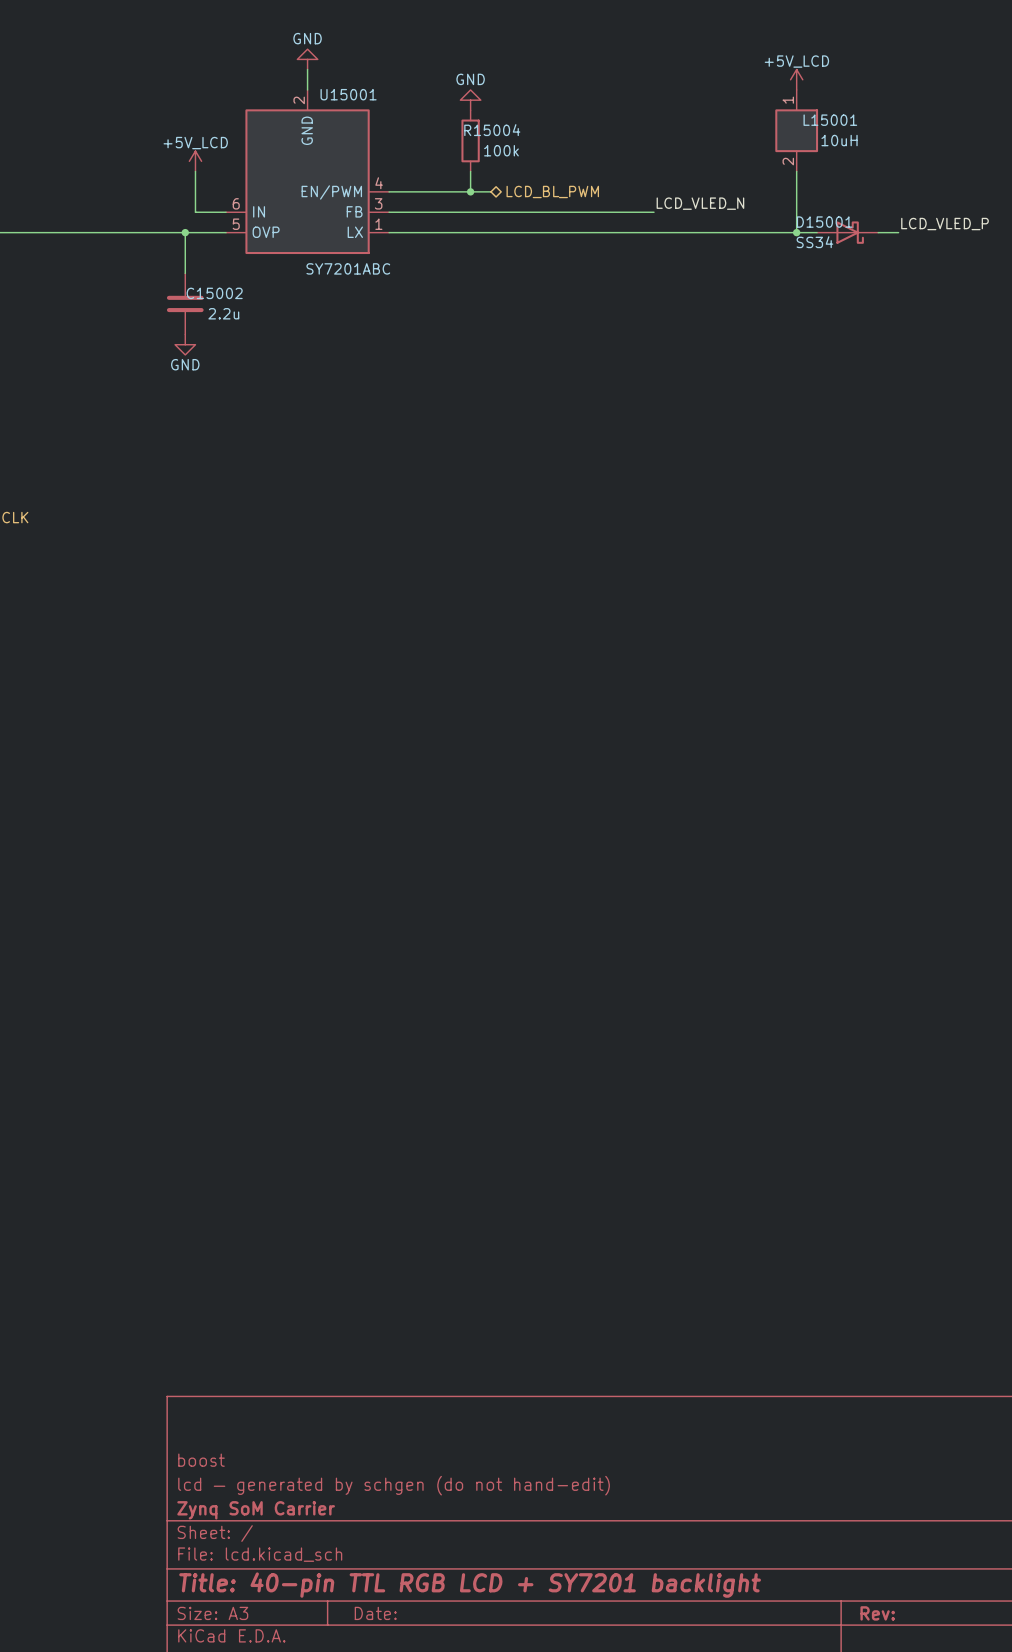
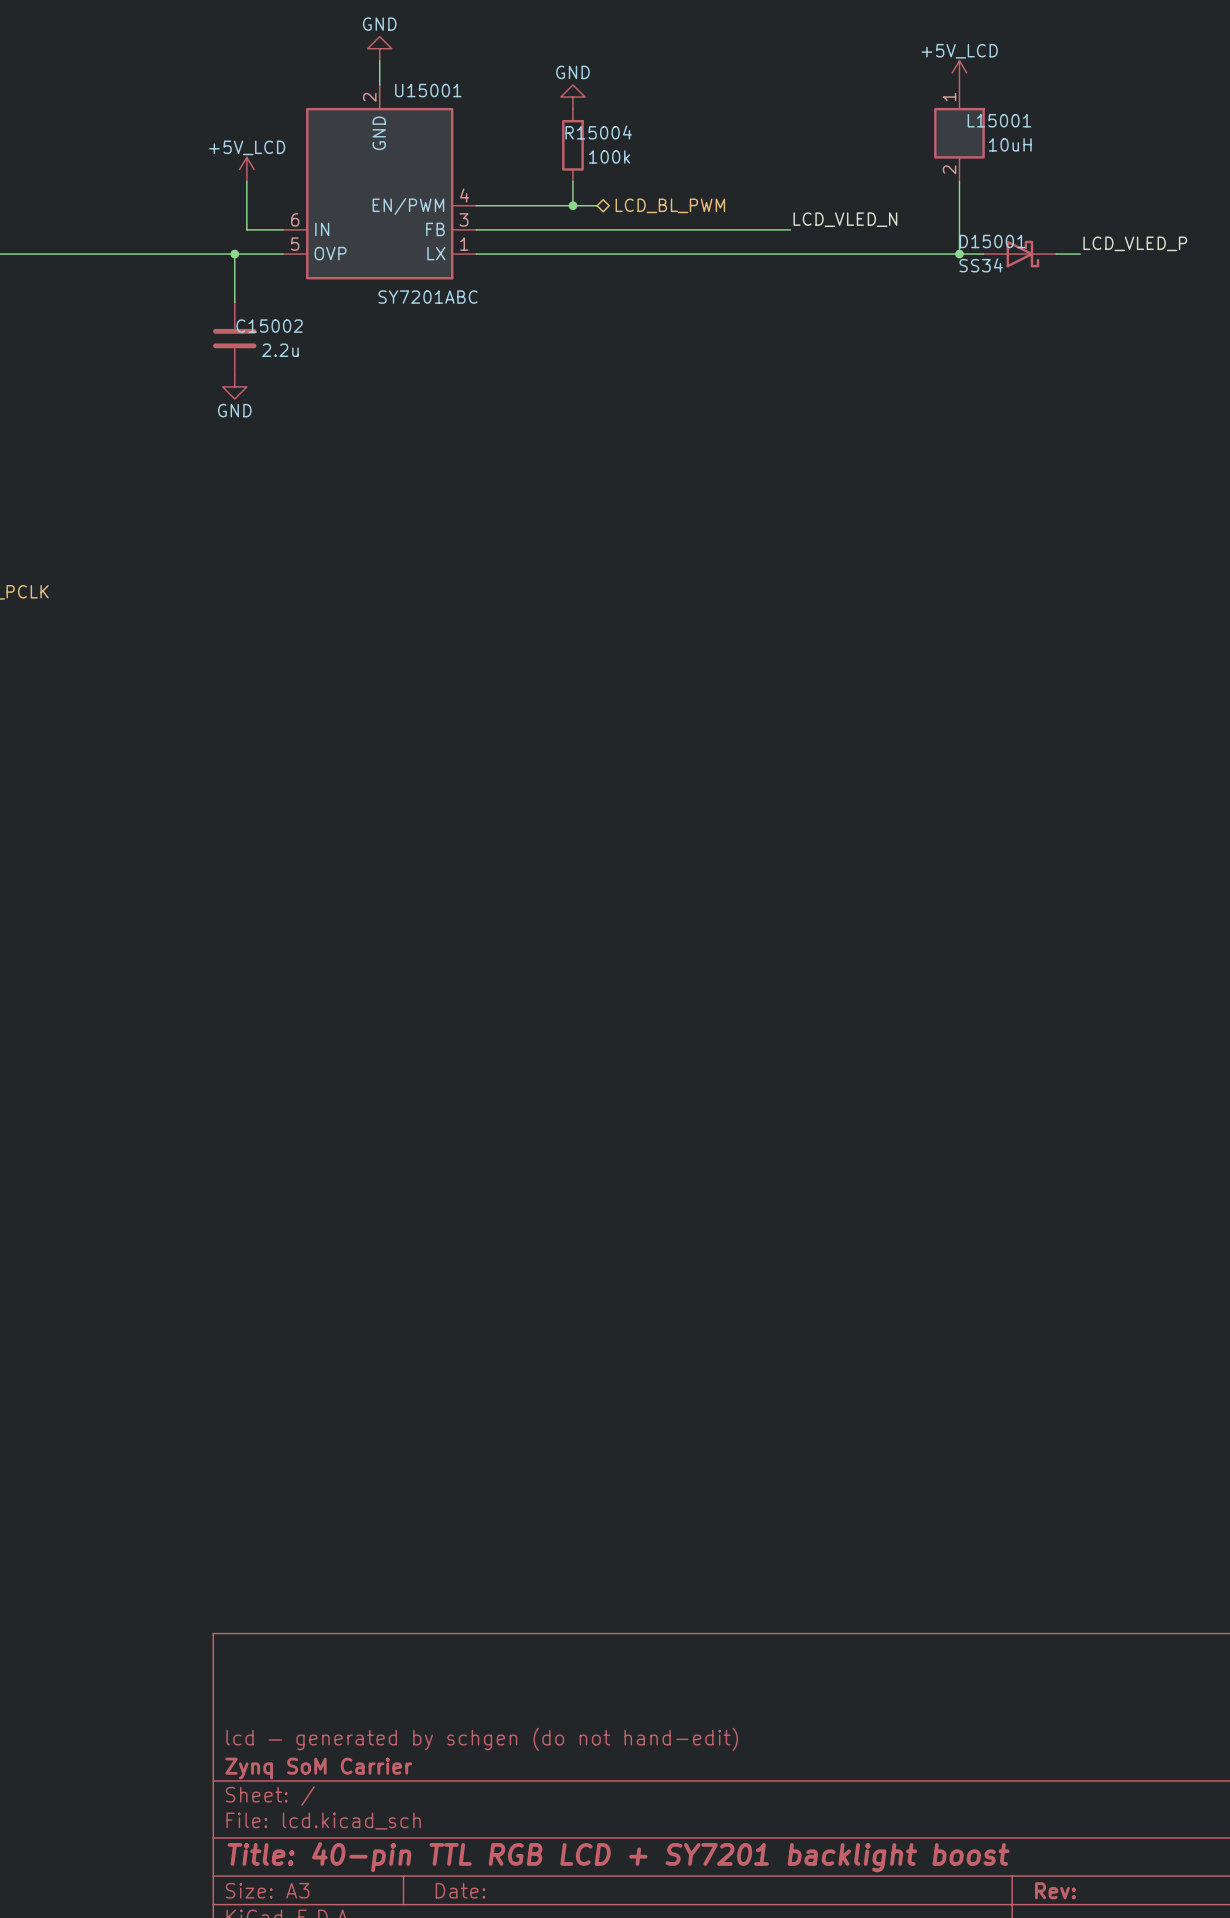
title block: boost (201, 1460) -> none
title block: Title: 40-pin TTL RGB LCD + SY7201 backlight (470, 1585) -> Title: 40-pin TTL RGB LCD + SY7201 backlight boost (618, 1857)

